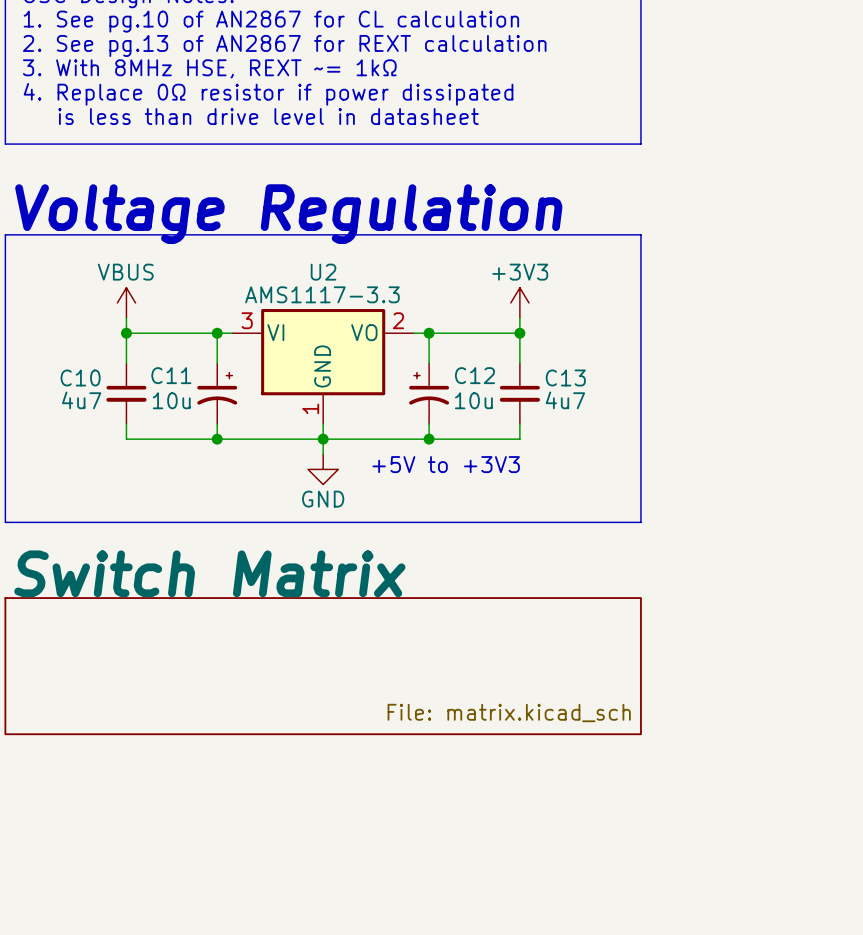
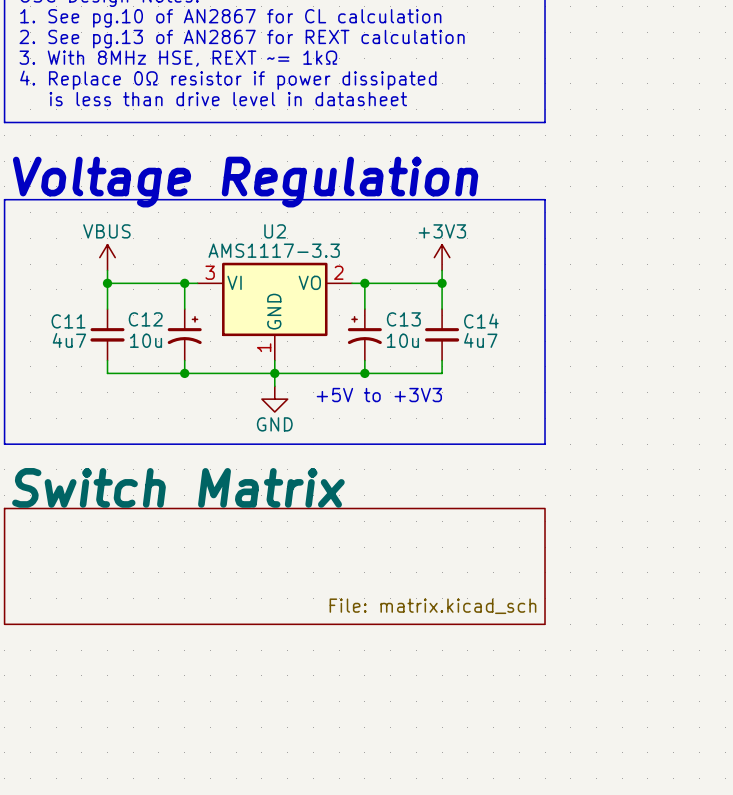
C11 name: C11 (171, 375) -> C12 (145, 319)
C12 name: C12 (474, 375) -> C13 (403, 319)
C10 name: C10 (80, 377) -> C11 (68, 321)
C13 name: C13 (565, 377) -> C14 (481, 321)

